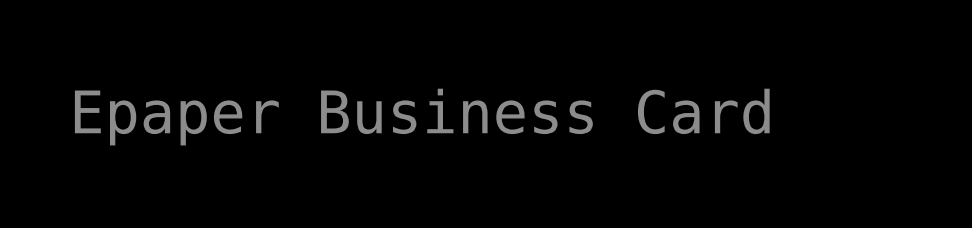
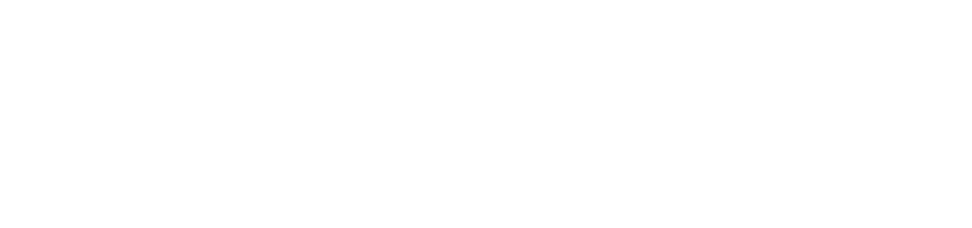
text: Epaper Business Card (422, 117) -> none

